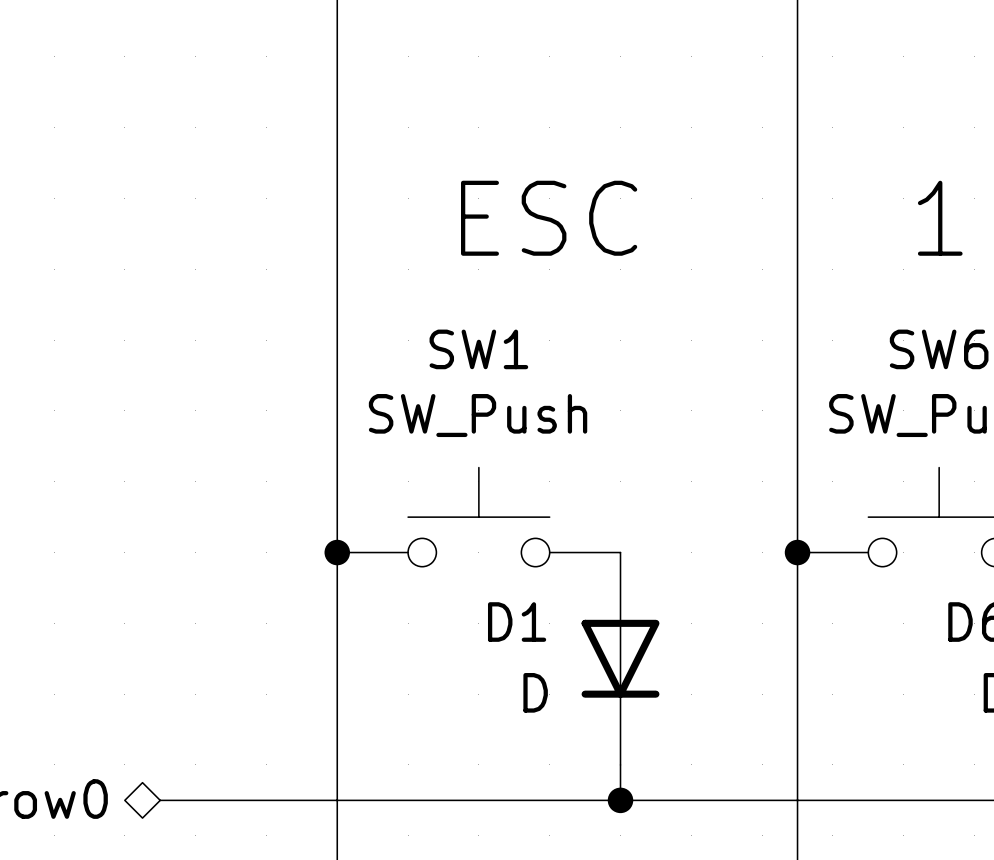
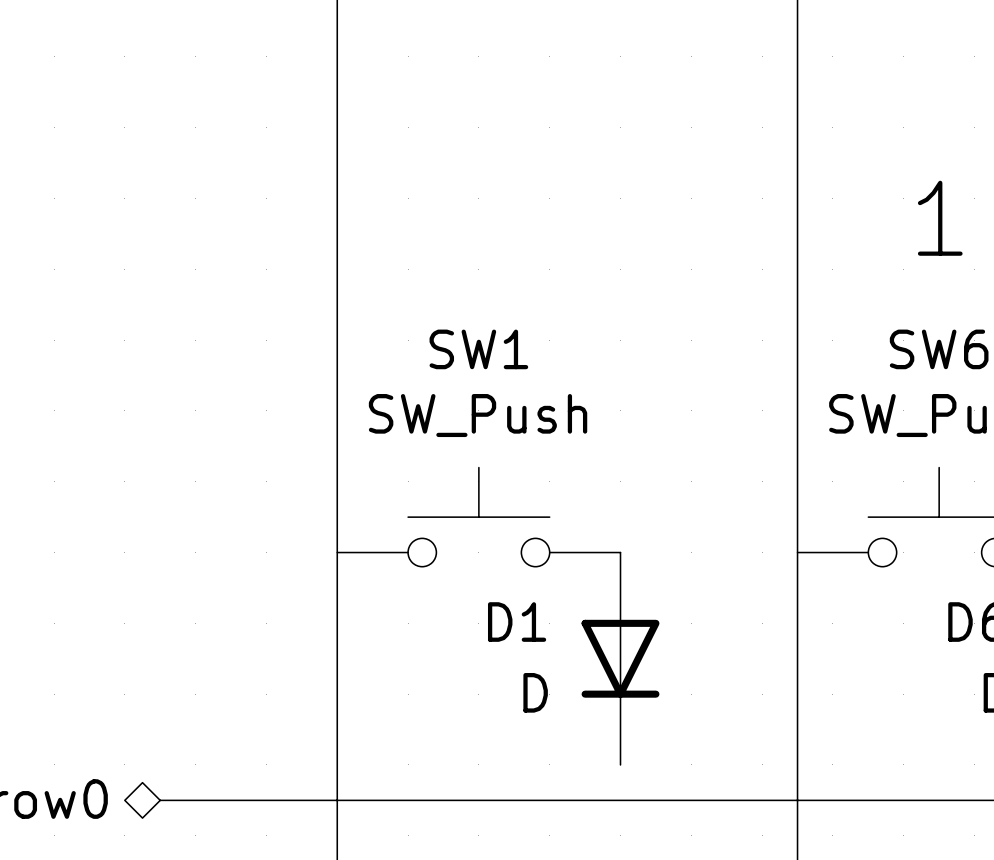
text: ESC (549, 218) -> none
junction: (337, 552) -> none
junction: (797, 552) -> none
wire: (620, 764) (620, 800) -> none
junction: (620, 800) -> none

